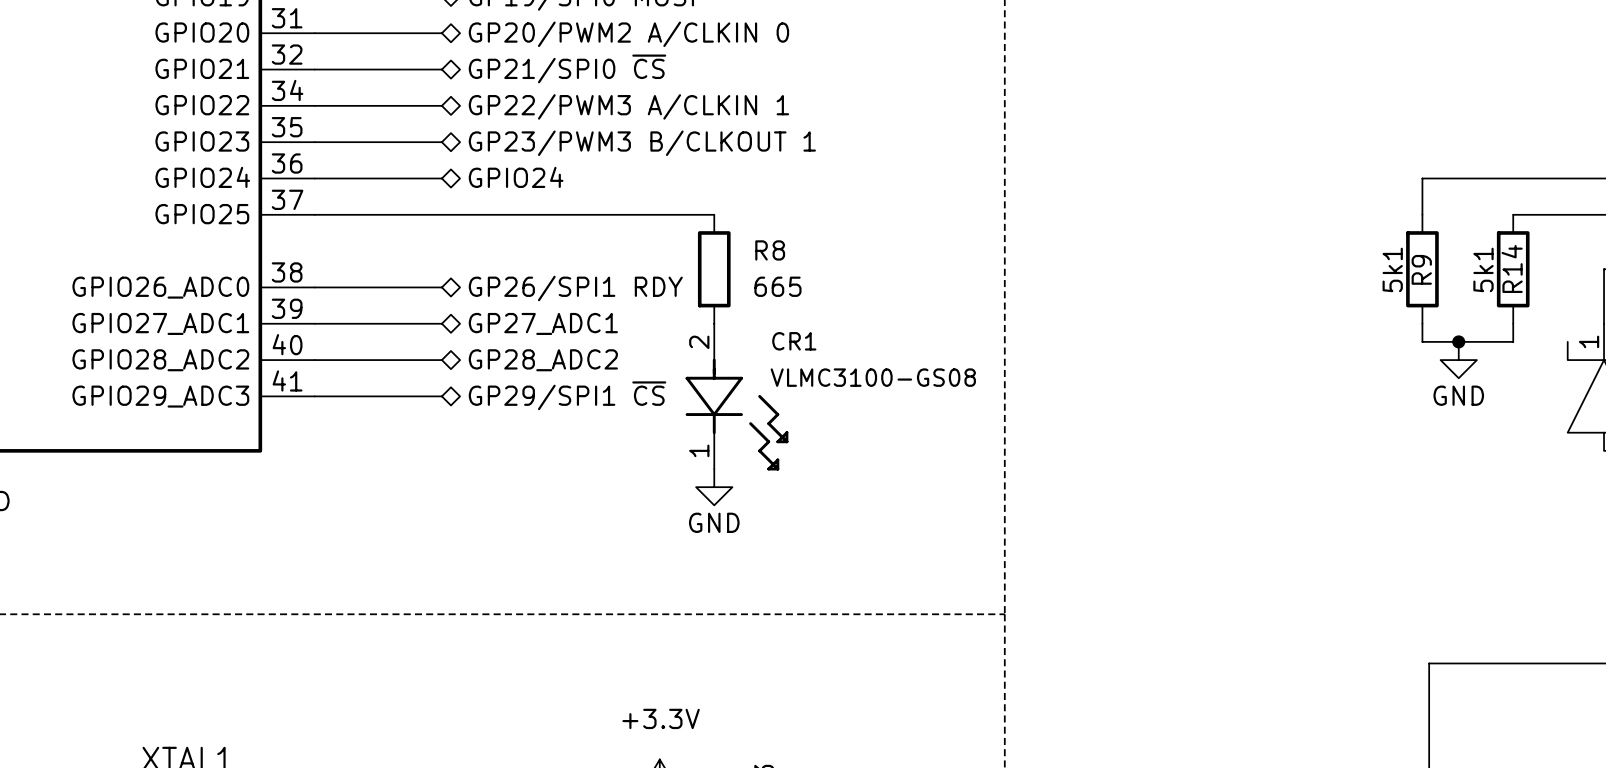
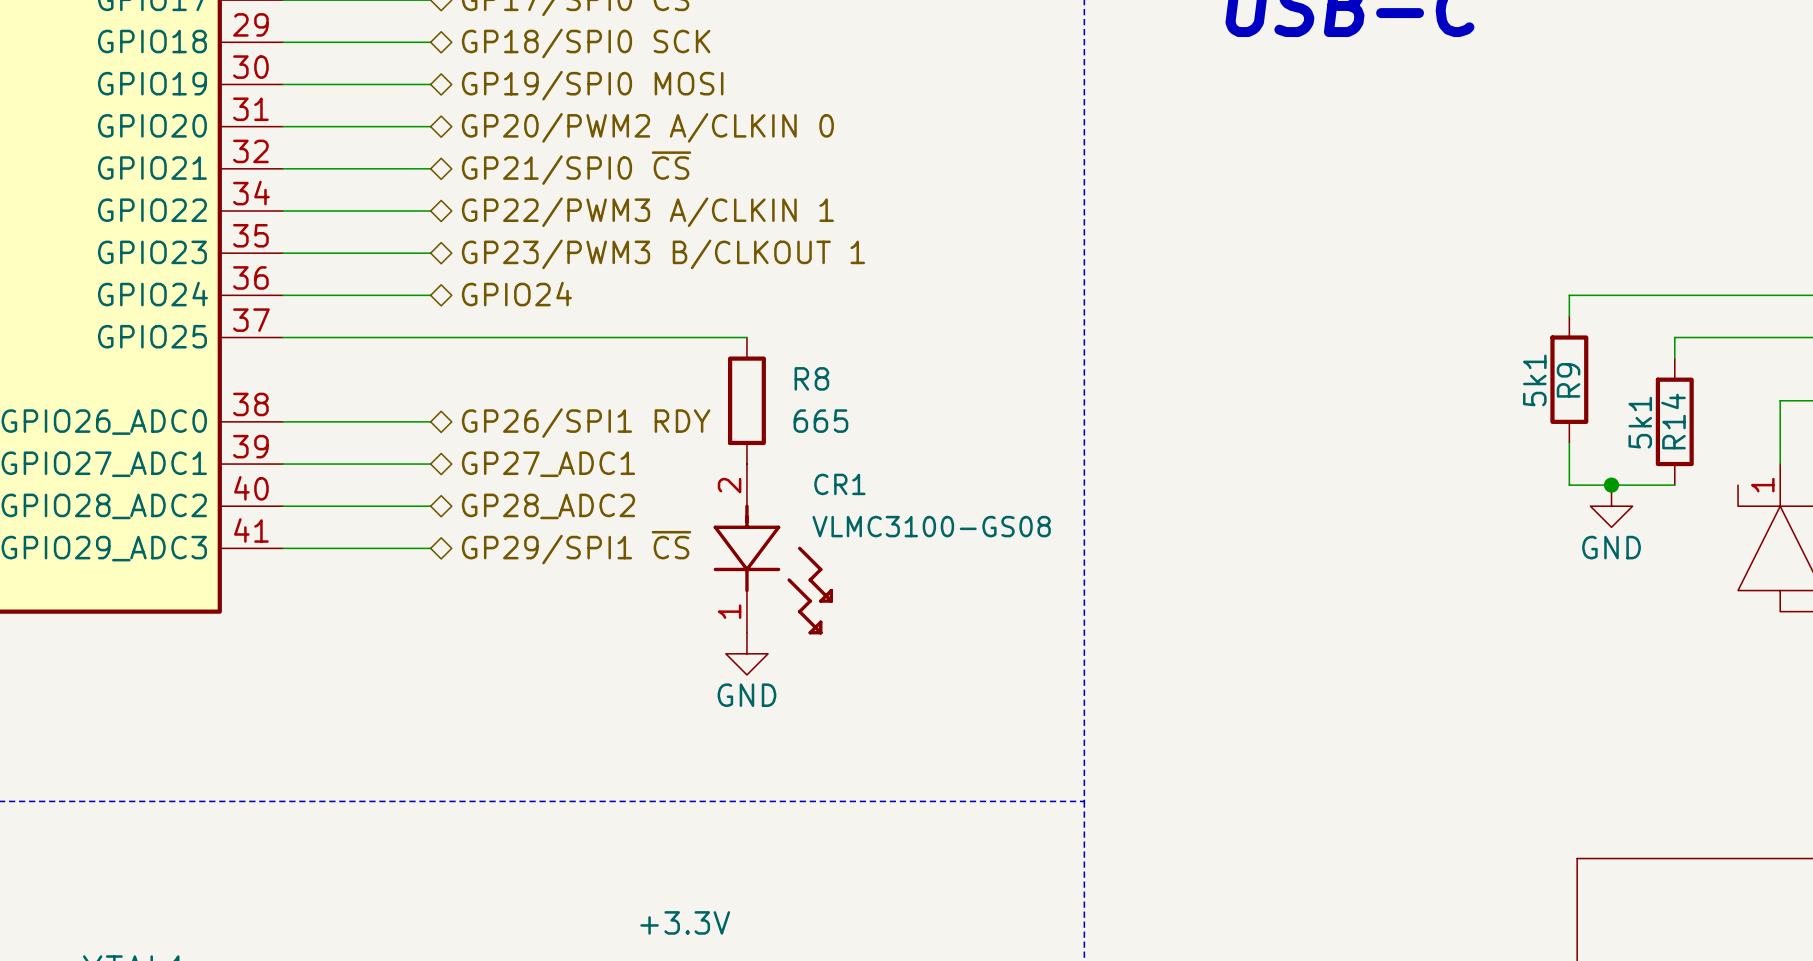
R9 position: (1422, 269) -> (1569, 379)
R14 position: (1513, 269) -> (1674, 421)

